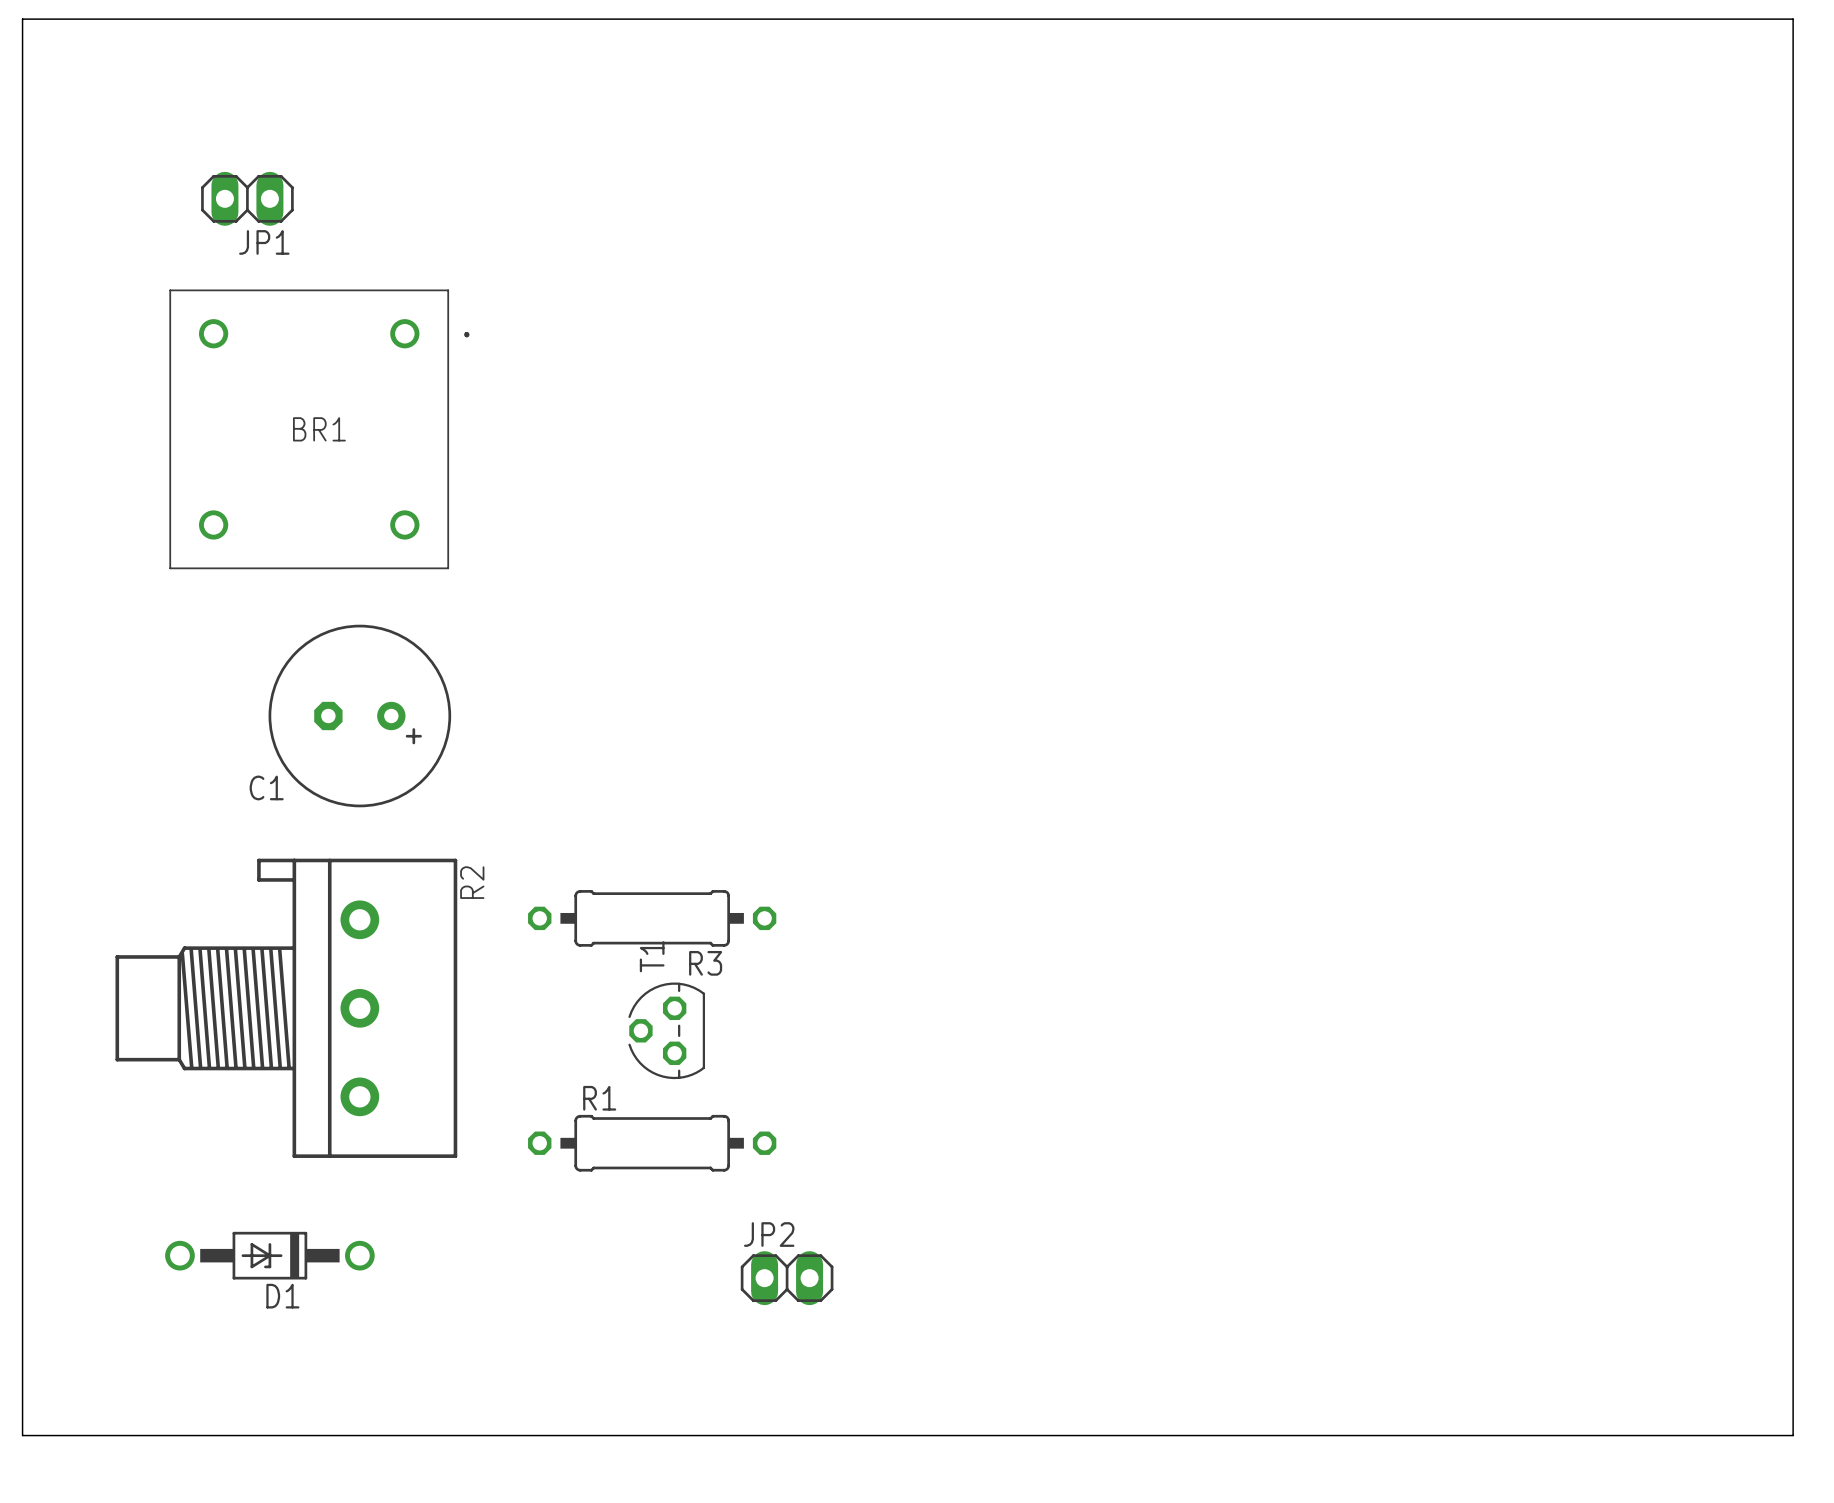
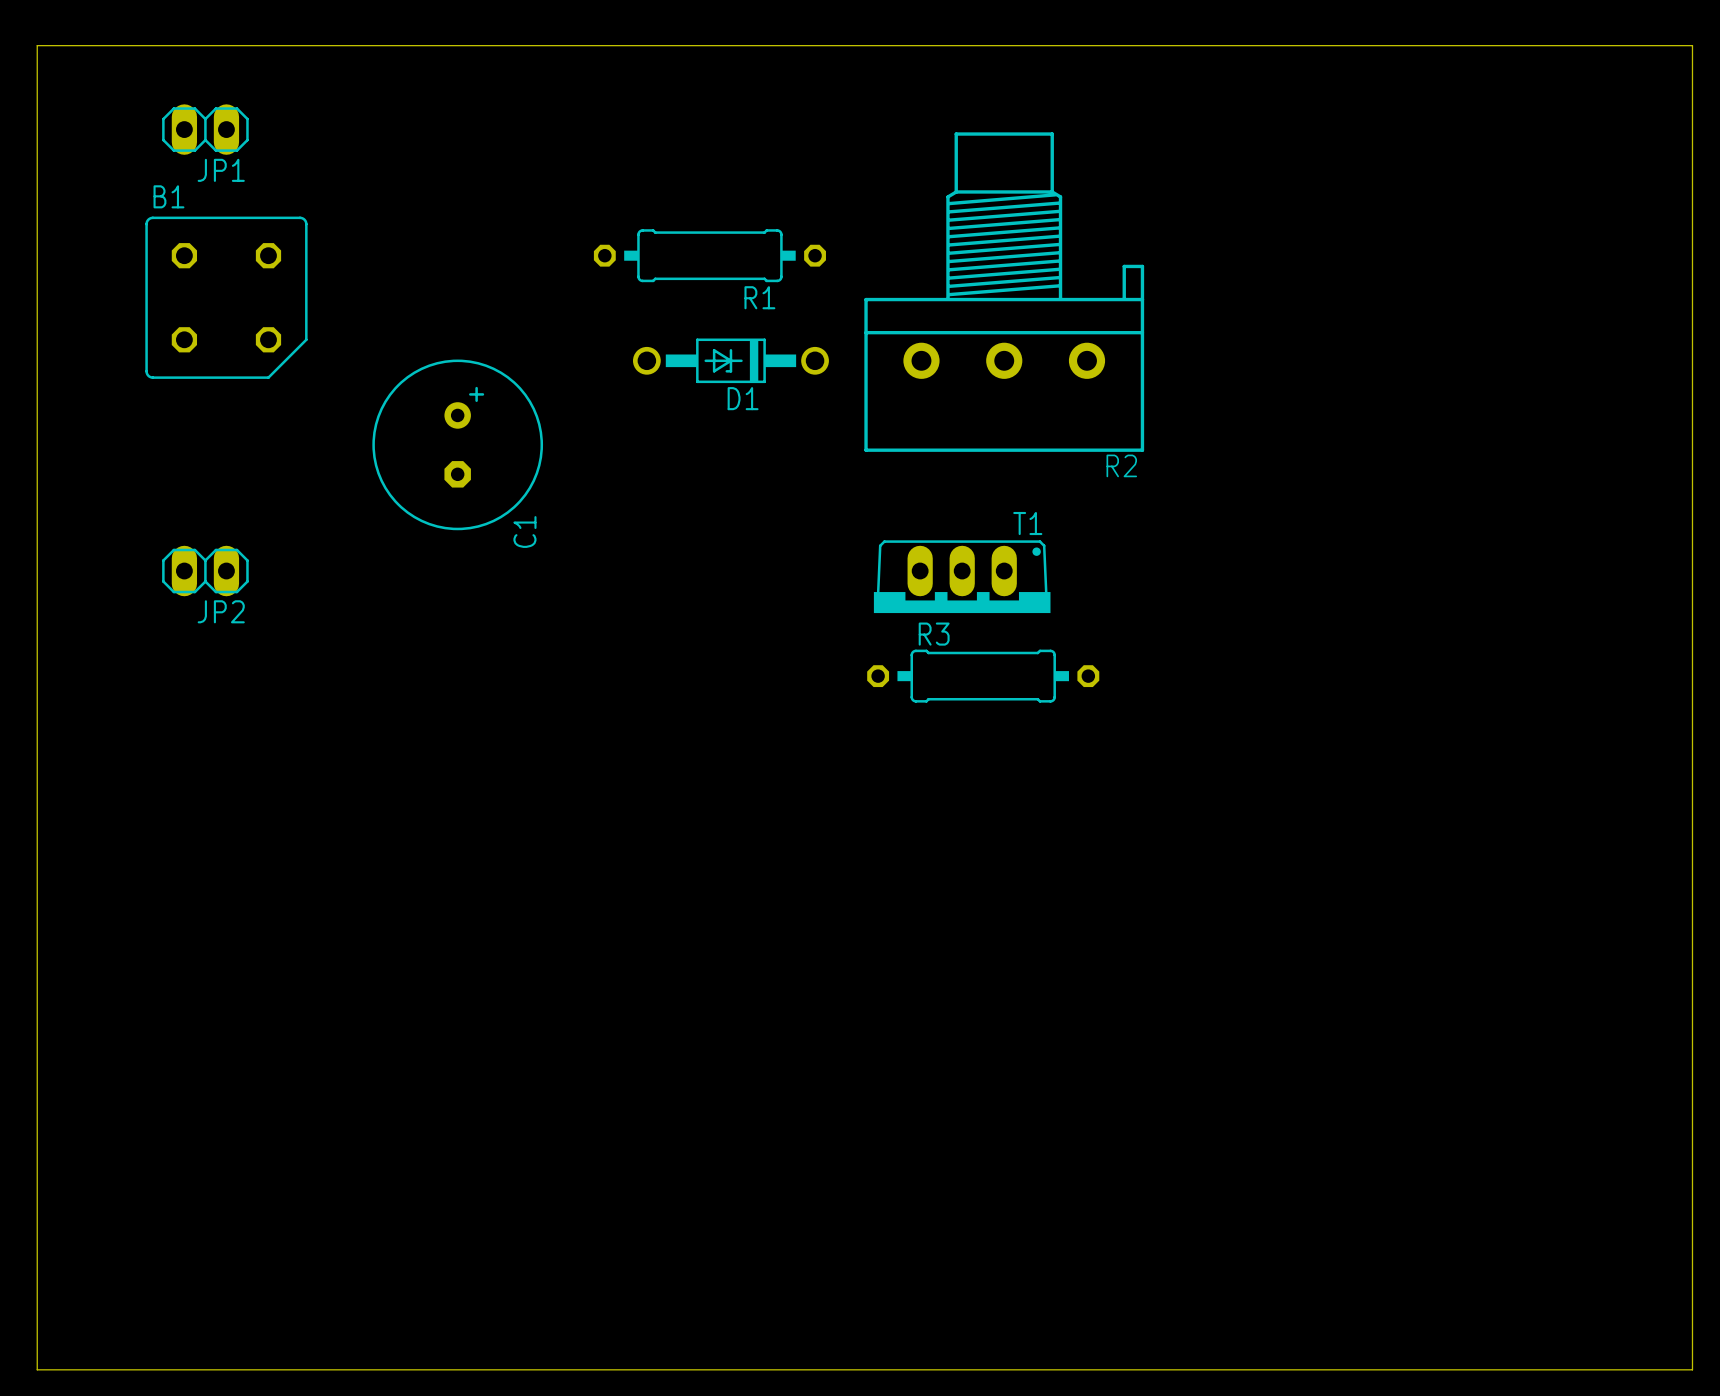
JP1 position: (247, 198) -> (205, 129)
B1: none -> (226, 297)
BR1: (319, 429) -> none
C1 rotation: 0° (359, 716) -> 90° counterclockwise (457, 444)
C1 position: (359, 716) -> (457, 444)
R3 position: (652, 918) -> (983, 676)
T1 name position: T1 (652, 956) -> T1 (1027, 523)
R3 name position: R3 (705, 963) -> R3 (934, 634)
T1 footprint: [628, 982, 706, 1080] -> [873, 540, 1051, 614]
R2 rotation: 0° (286, 1008) -> 90° clockwise (1004, 292)
R2 position: (286, 1008) -> (1004, 292)
R1 name position: R1 (599, 1098) -> R1 (759, 297)
R1 position: (652, 1143) -> (709, 255)
JP2 name position: JP2 (769, 1234) -> JP2 (221, 611)
D1 position: (269, 1255) -> (730, 360)
JP2 position: (787, 1278) -> (205, 571)

